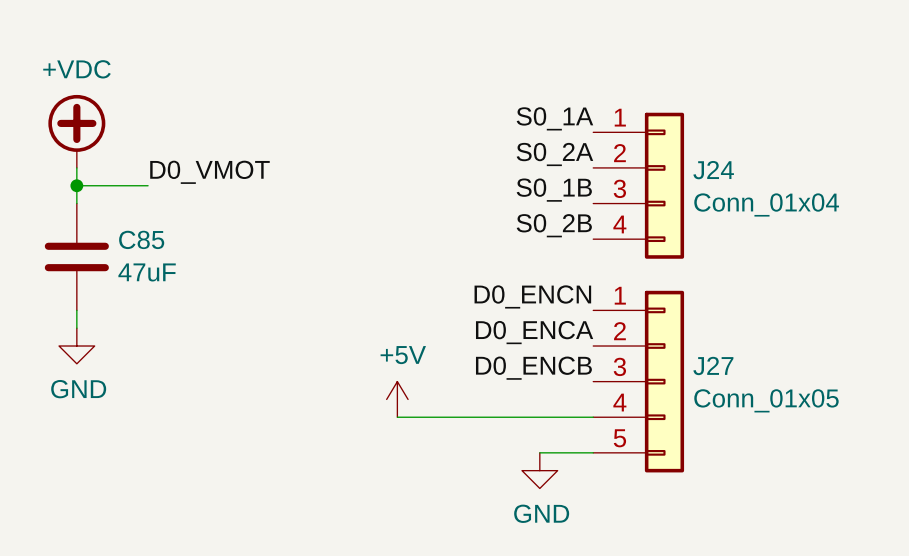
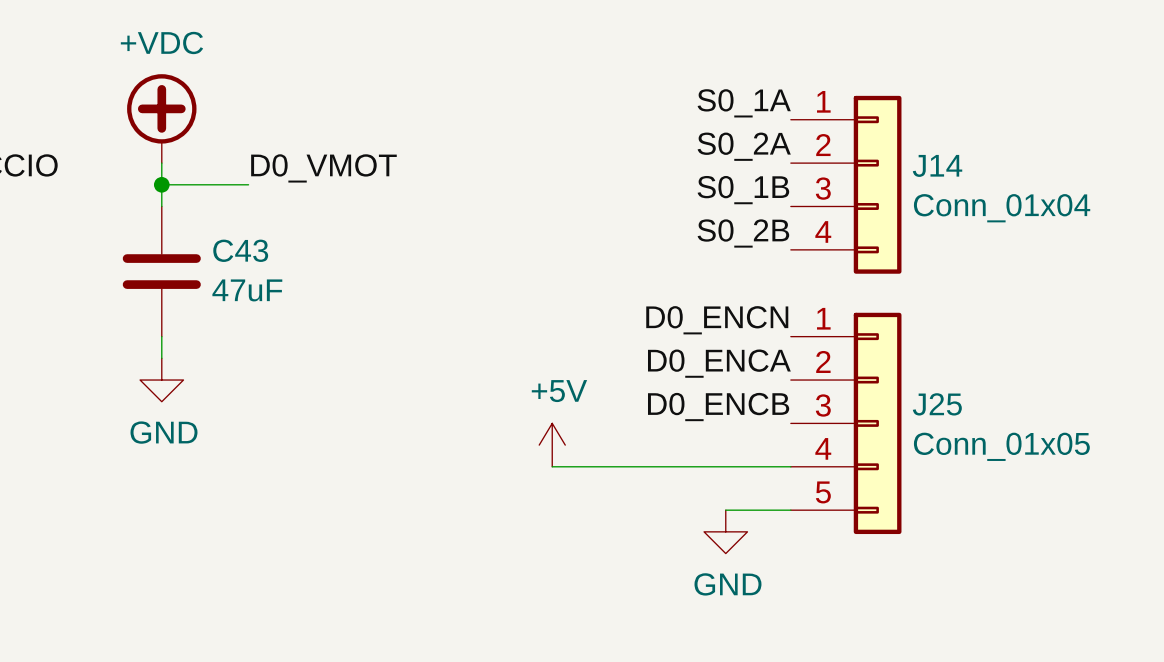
J24 name: J24 (713, 170) -> J14 (937, 165)
C85 name: C85 (141, 239) -> C43 (240, 250)
J27 name: J27 (713, 365) -> J25 (937, 404)

